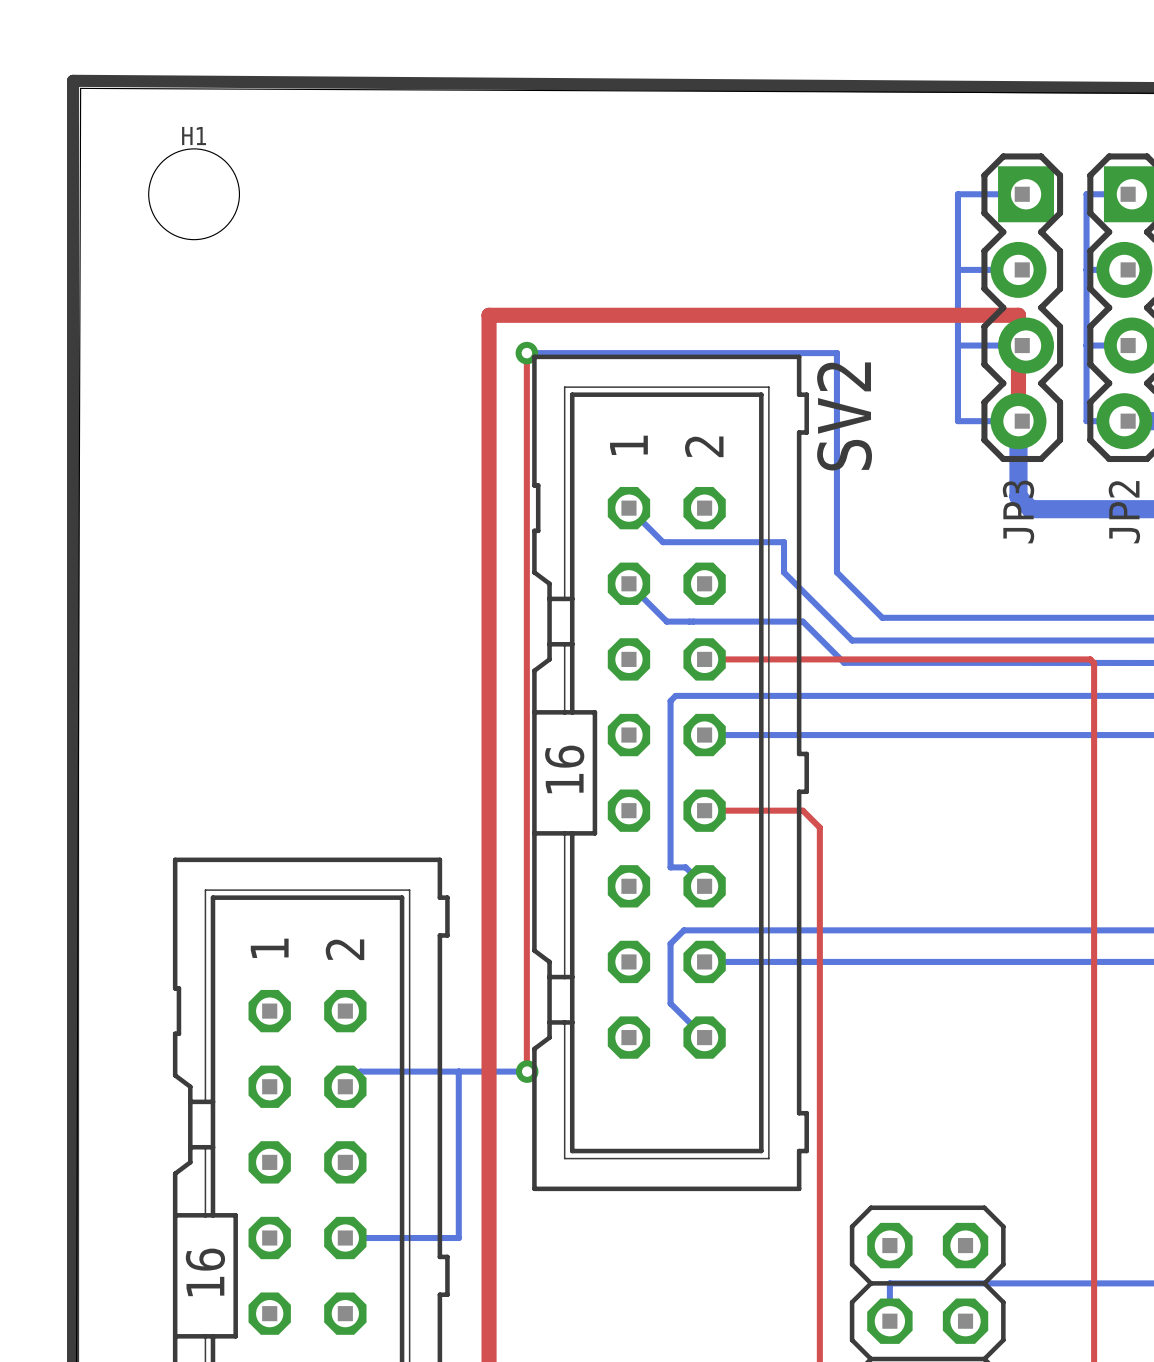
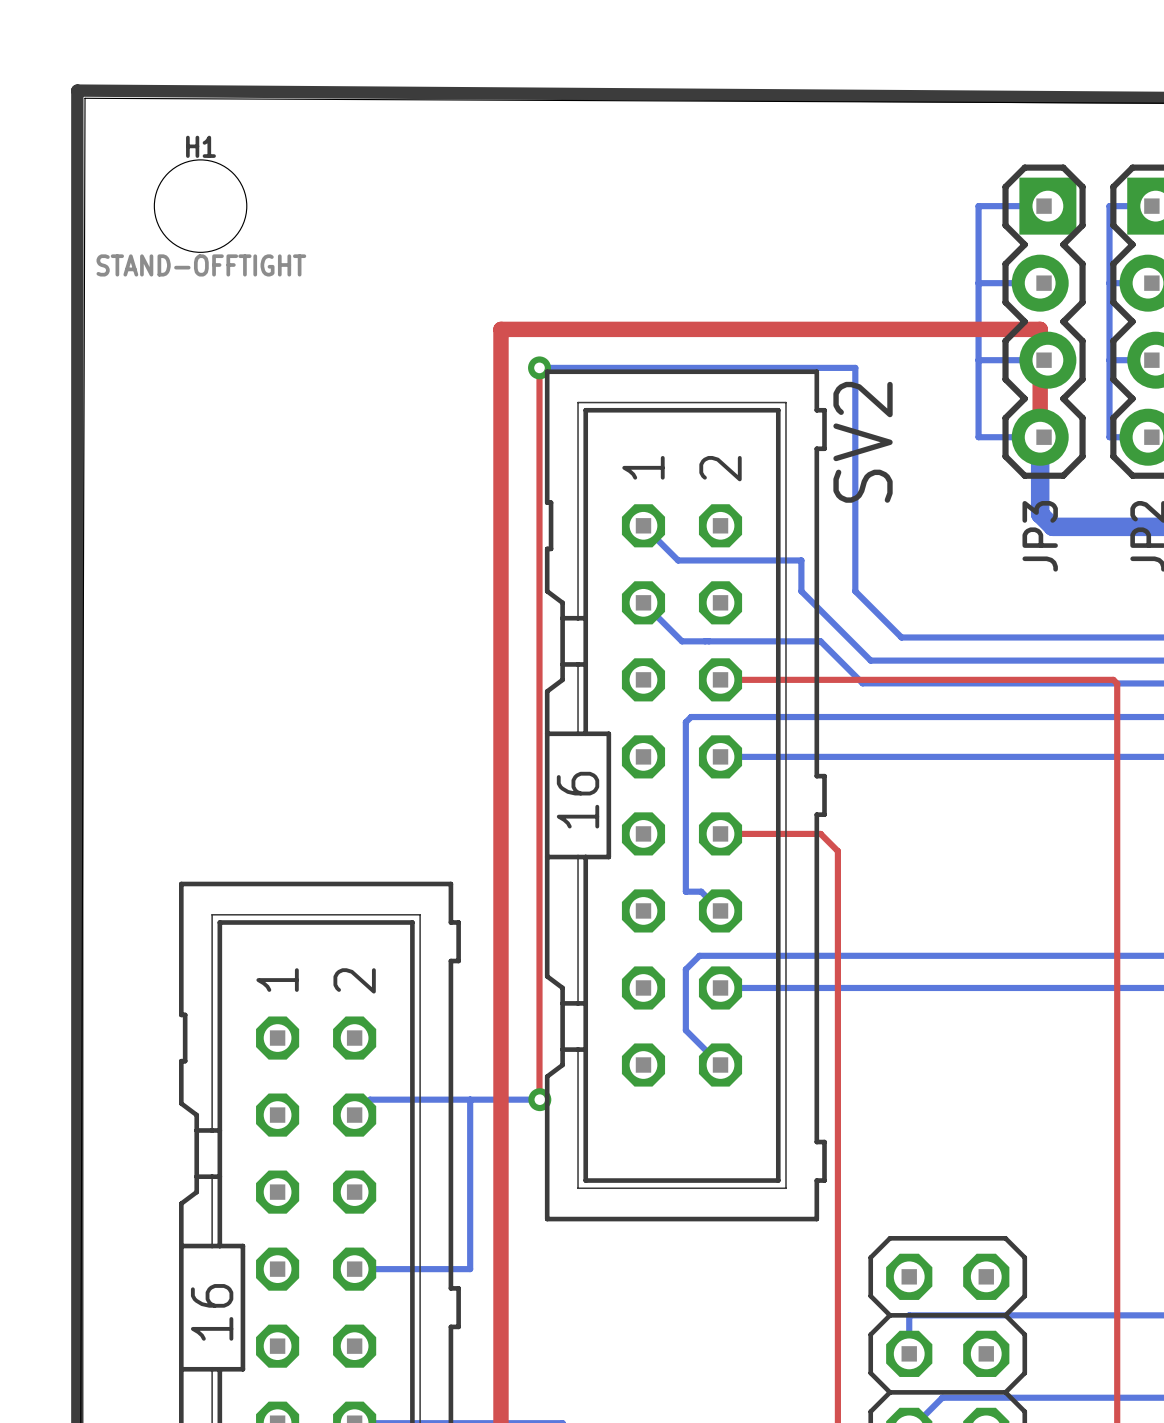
H1 value: none -> STAND-OFFTIGHT (201, 265)

